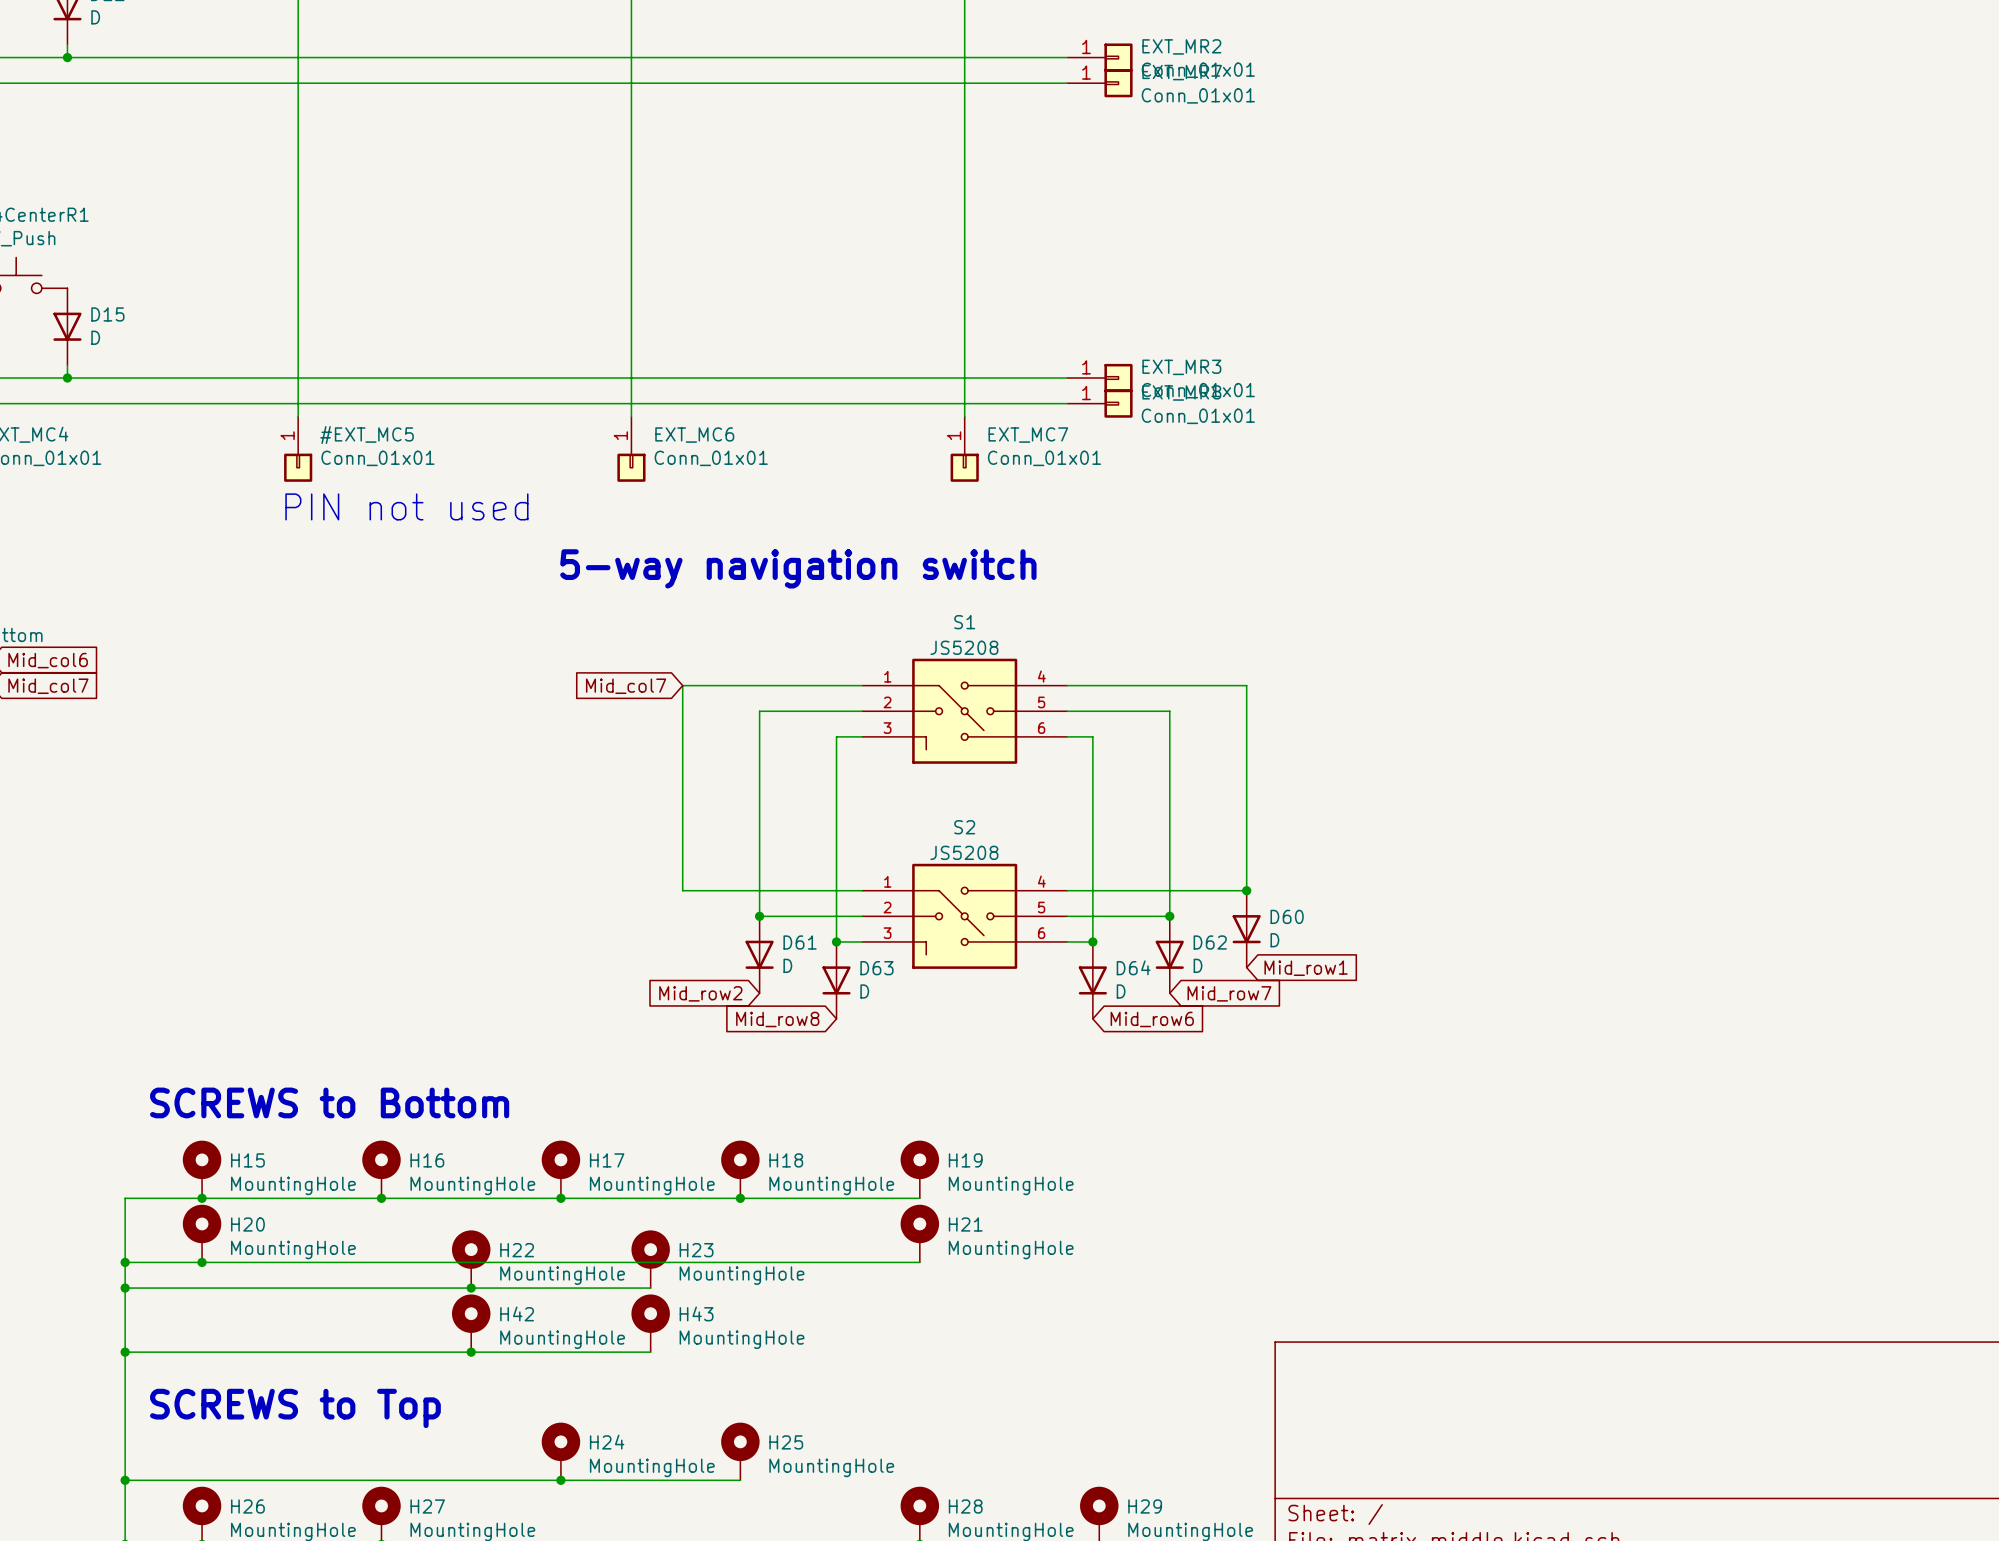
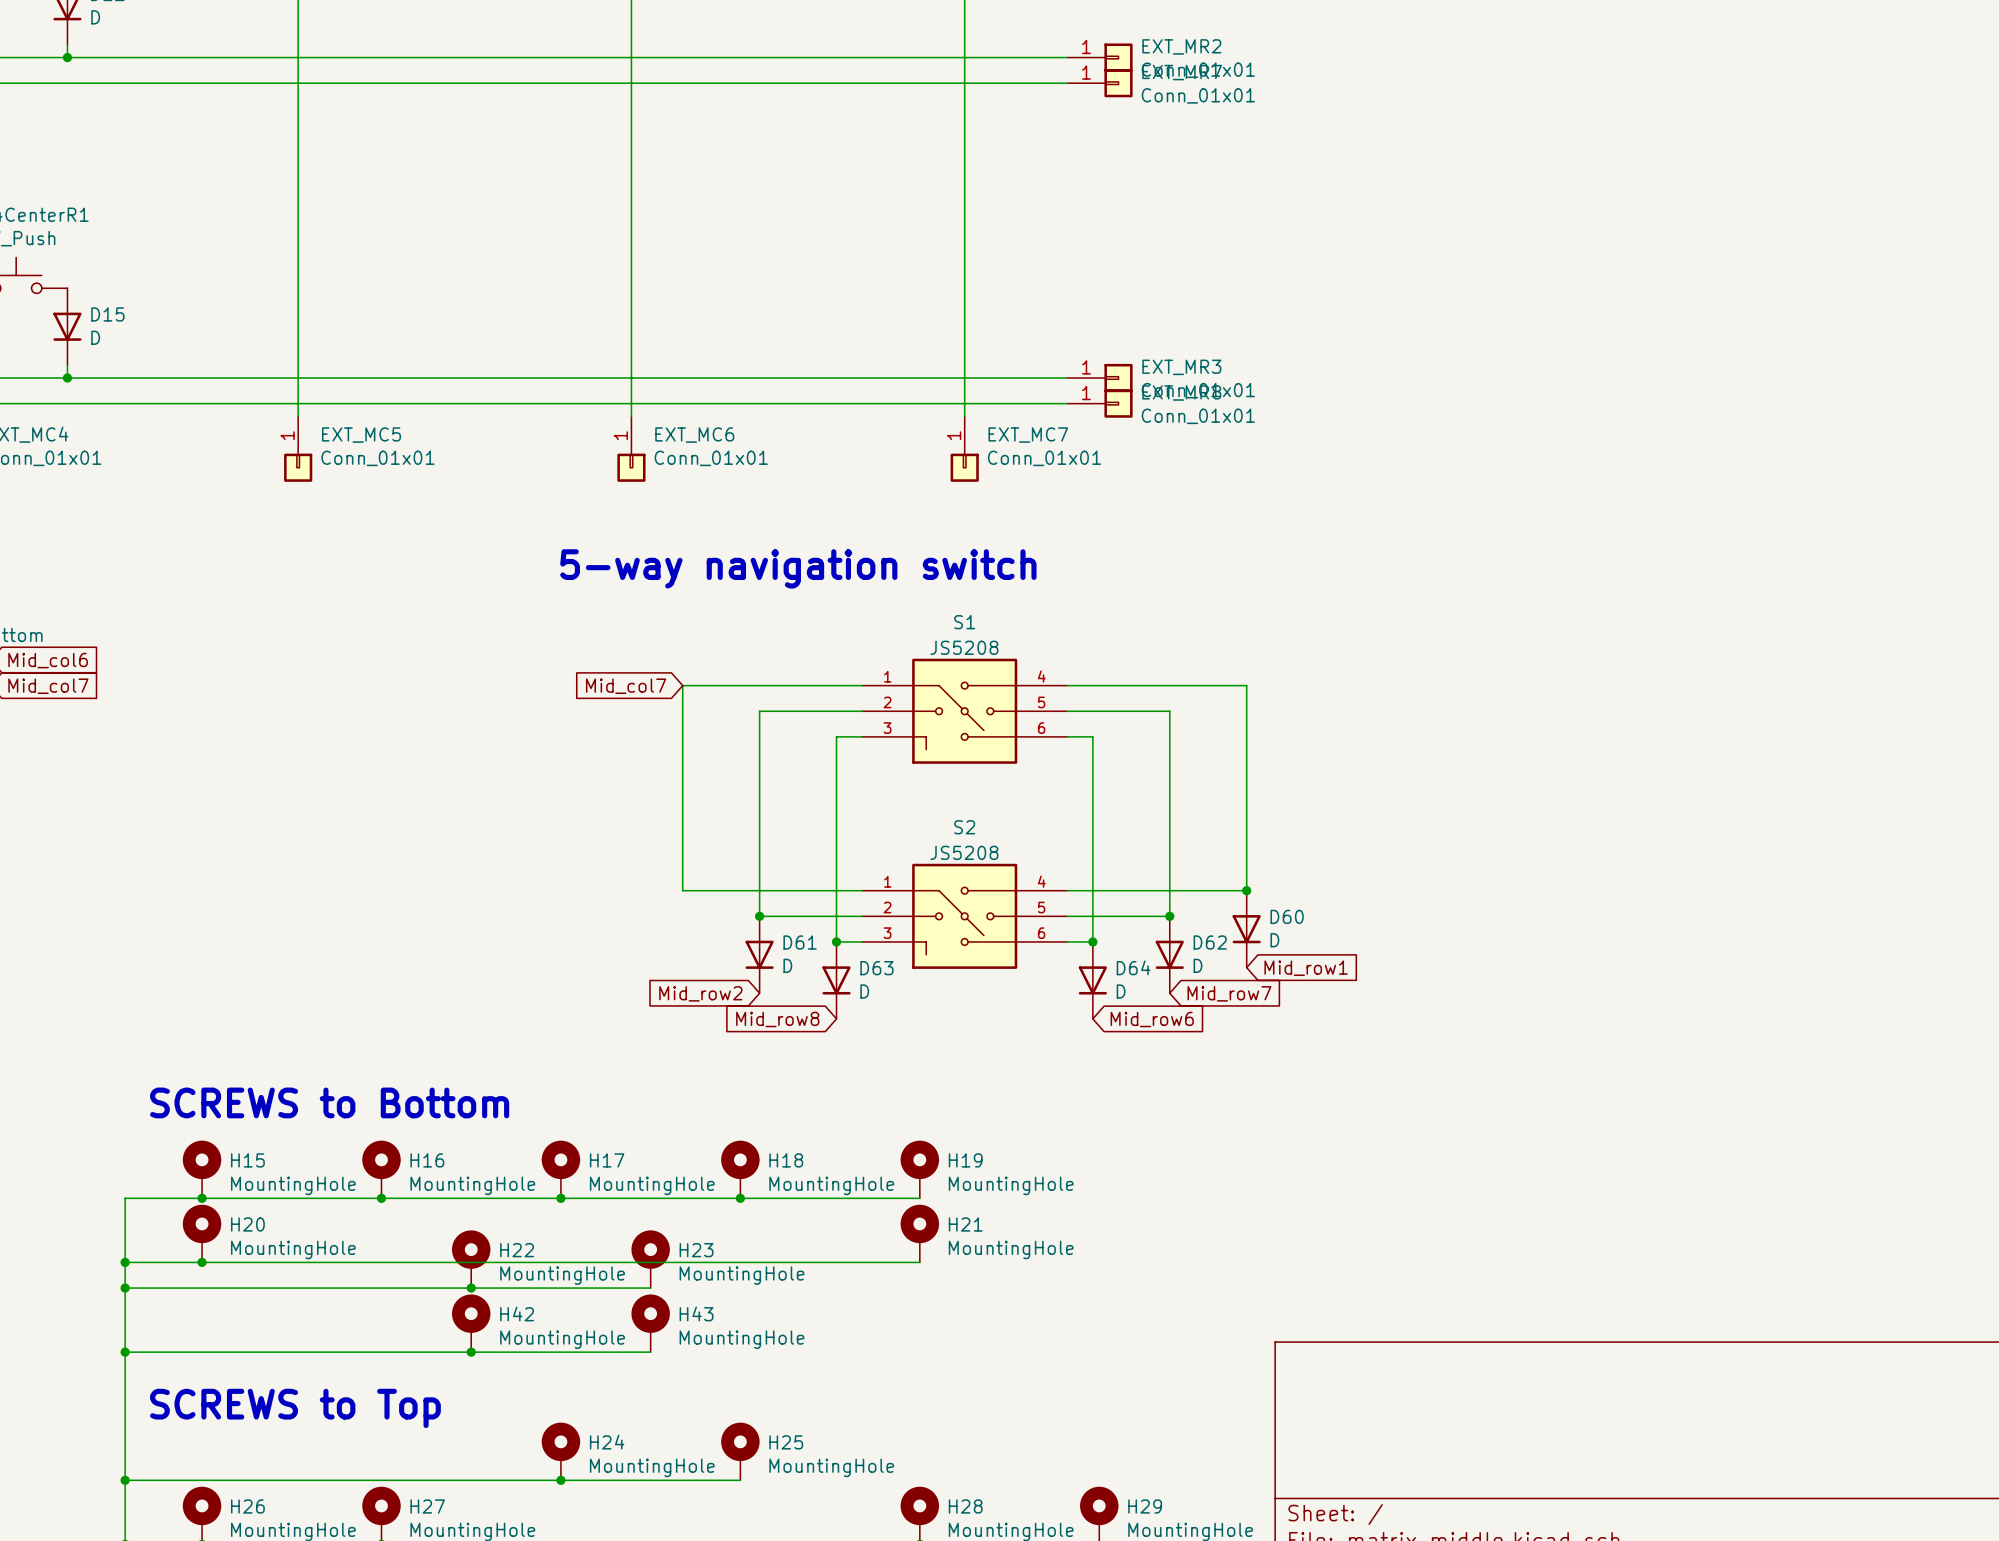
#EXT_MC5: Conn_01x01 (298, 449) -> none
EXT_MC5: none -> Conn_01x01 (298, 449)
text: PIN not used (406, 506) -> none

